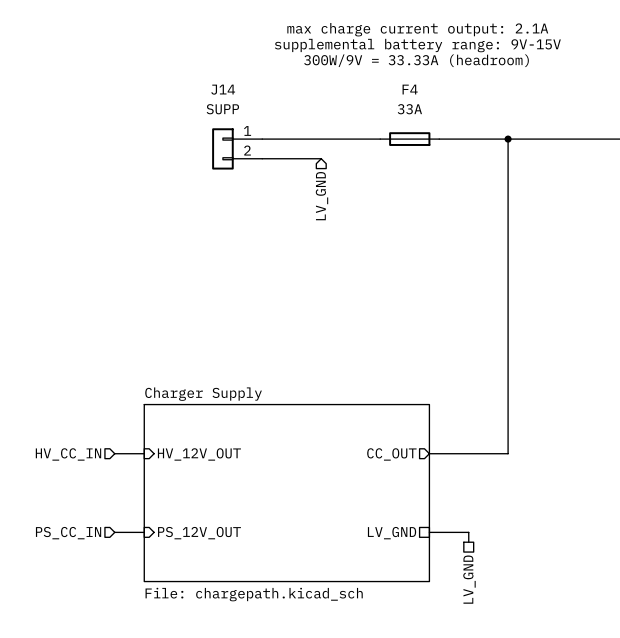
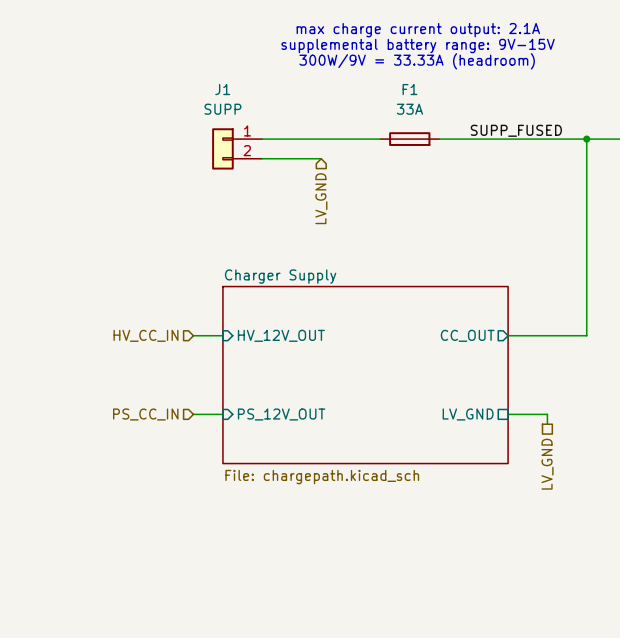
J14 name: J14 (223, 89) -> J1 (222, 89)
F4 name: F4 (410, 89) -> F1 (409, 89)
label: none -> SUPP_FUSED (516, 130)
wire: (508, 139) (508, 453) (429, 453) -> none
junction: (508, 139) -> none
wire: none -> (586, 139) (586, 335) (508, 335)
junction: none -> (586, 139)
wire: (114, 453) (144, 453) -> (193, 335) (222, 335)
hierarchical label position: HV_CC_IN (68, 454) -> HV_CC_IN (145, 335)
sheet pin position: HV_12V_OUT (199, 454) -> HV_12V_OUT (281, 335)
sheet pin position: CC_OUT (391, 454) -> CC_OUT (467, 335)
sheet Charger Supply position: (286, 493) -> (365, 375)
wire: (114, 532) (144, 532) -> (193, 414) (222, 414)
wire: (429, 532) (468, 532) (468, 542) -> (508, 414) (547, 414) (547, 424)
hierarchical label position: PS_CC_IN (68, 533) -> PS_CC_IN (145, 414)
sheet pin position: PS_12V_OUT (199, 533) -> PS_12V_OUT (281, 414)
sheet pin position: LV_GND (392, 533) -> LV_GND (468, 414)
hierarchical label position: LV_GND (469, 579) -> LV_GND (547, 464)

